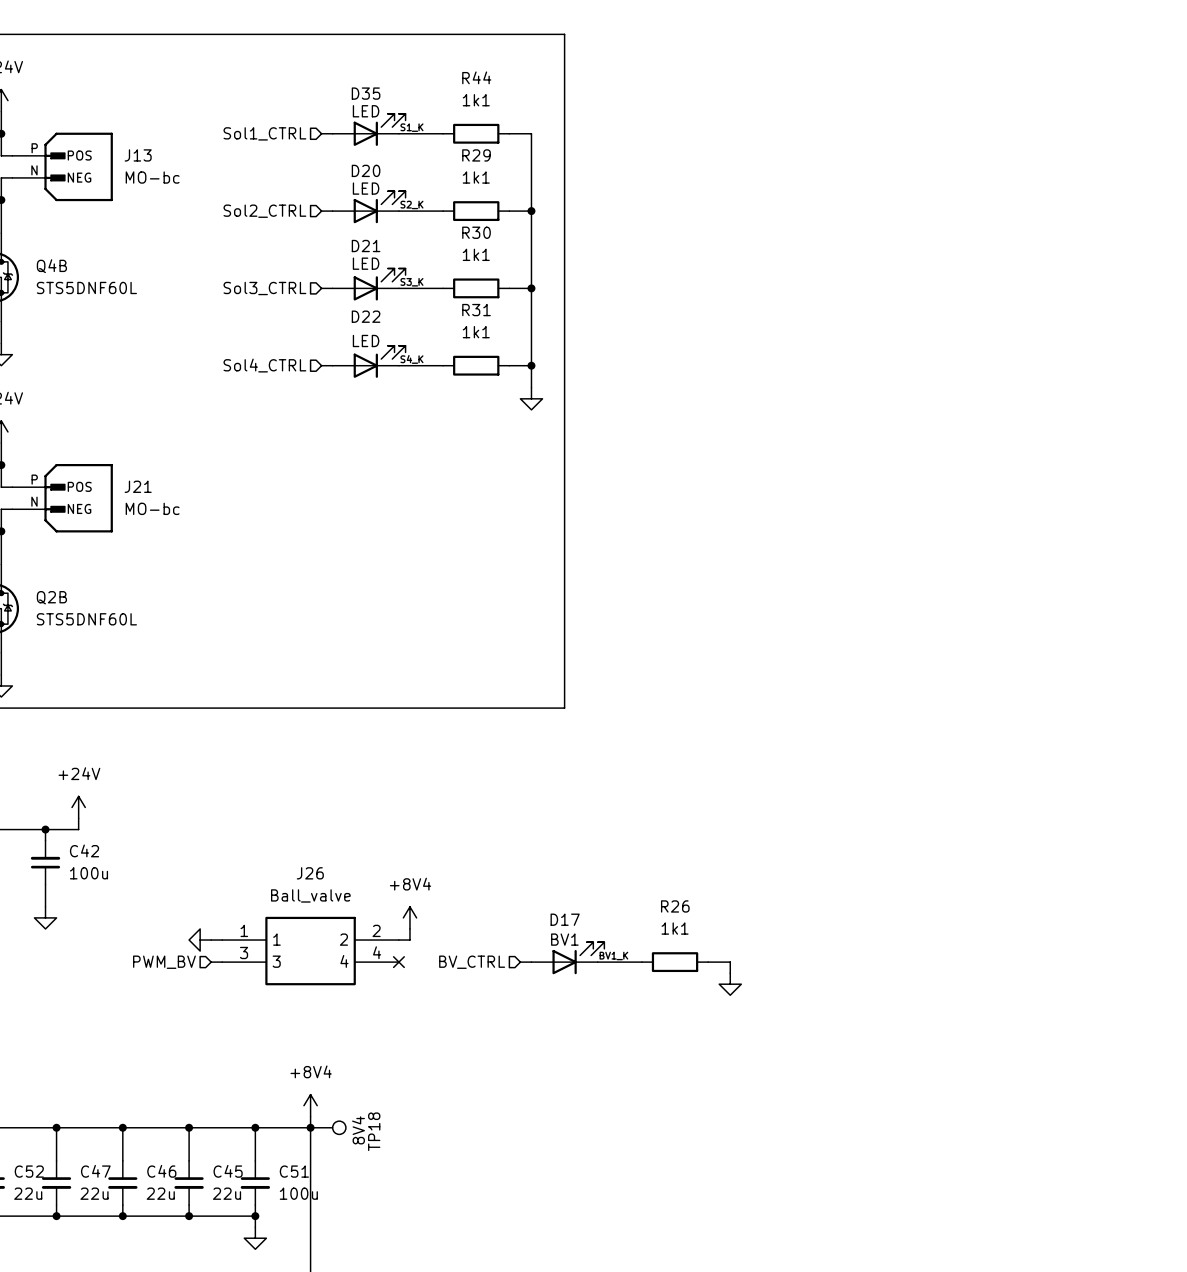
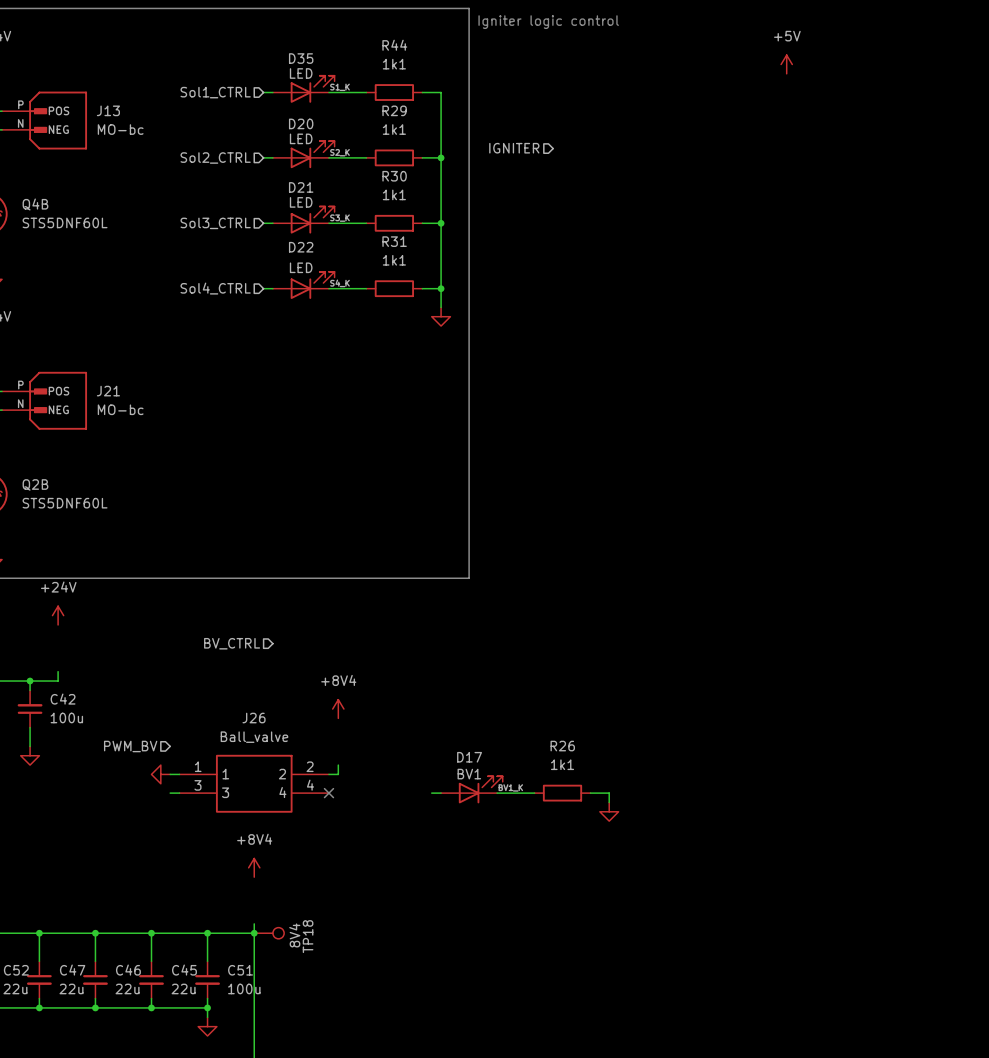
text: none -> Igniter logic control (548, 22)
power symbol: none -> +5V (786, 64)
hierarchical label: none -> IGNITER (514, 148)
hierarchical label: none -> BV_CTRL (232, 643)
power symbol position: +24V (78, 807) -> +24V (58, 615)
power symbol position: +8V4 (409, 917) -> +8V4 (338, 709)
hierarchical label position: PWM_BV (164, 962) -> PWM_BV (130, 746)
hierarchical label: BV_CTRL (472, 962) -> none
power symbol position: +8V4 (310, 1105) -> +8V4 (254, 867)

